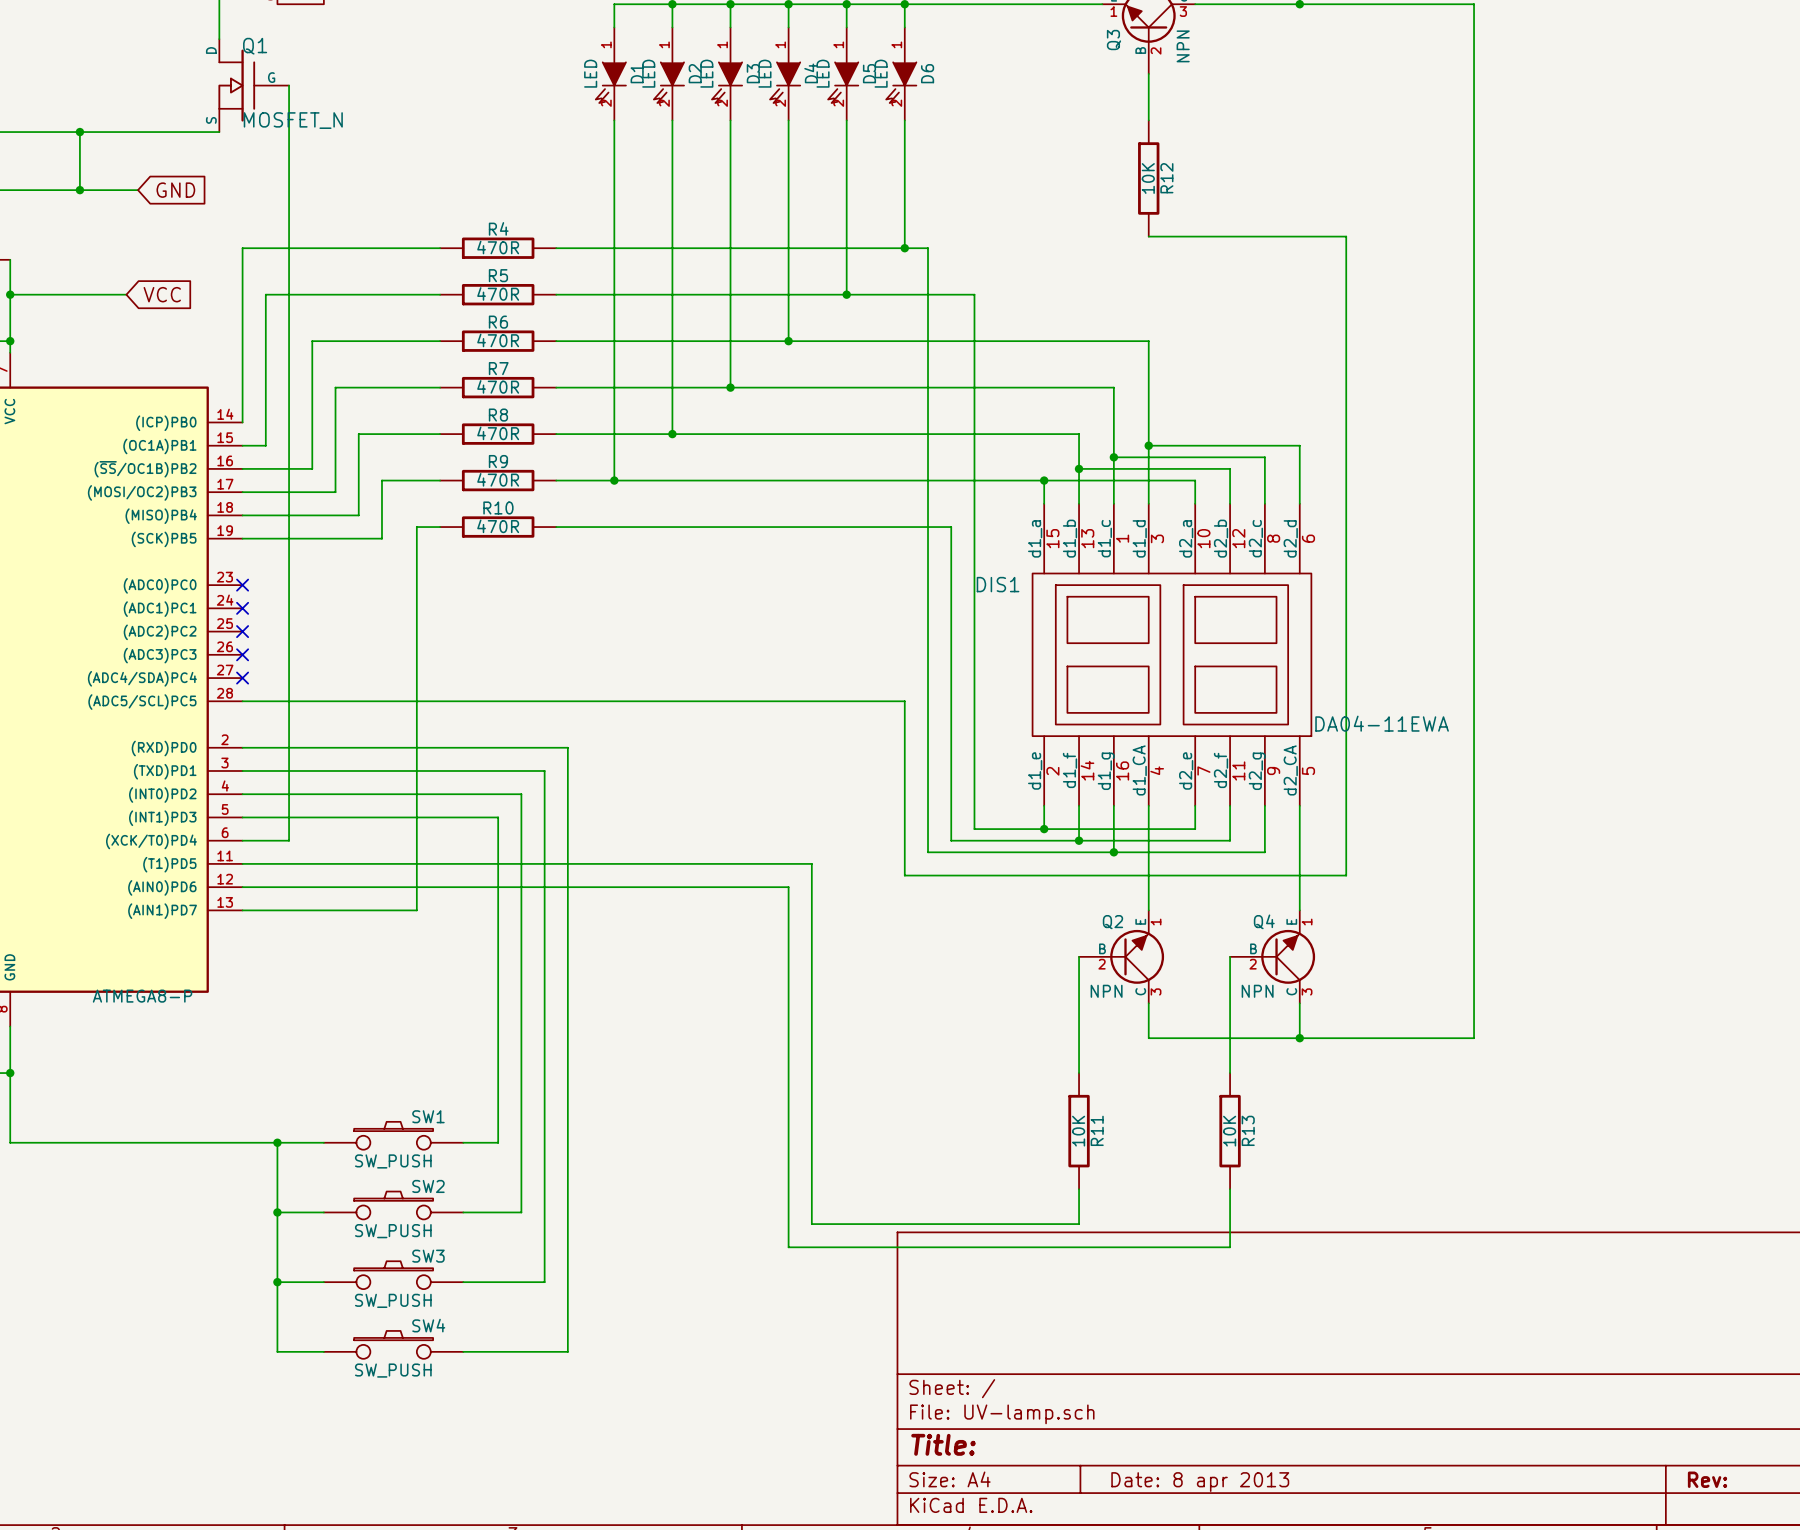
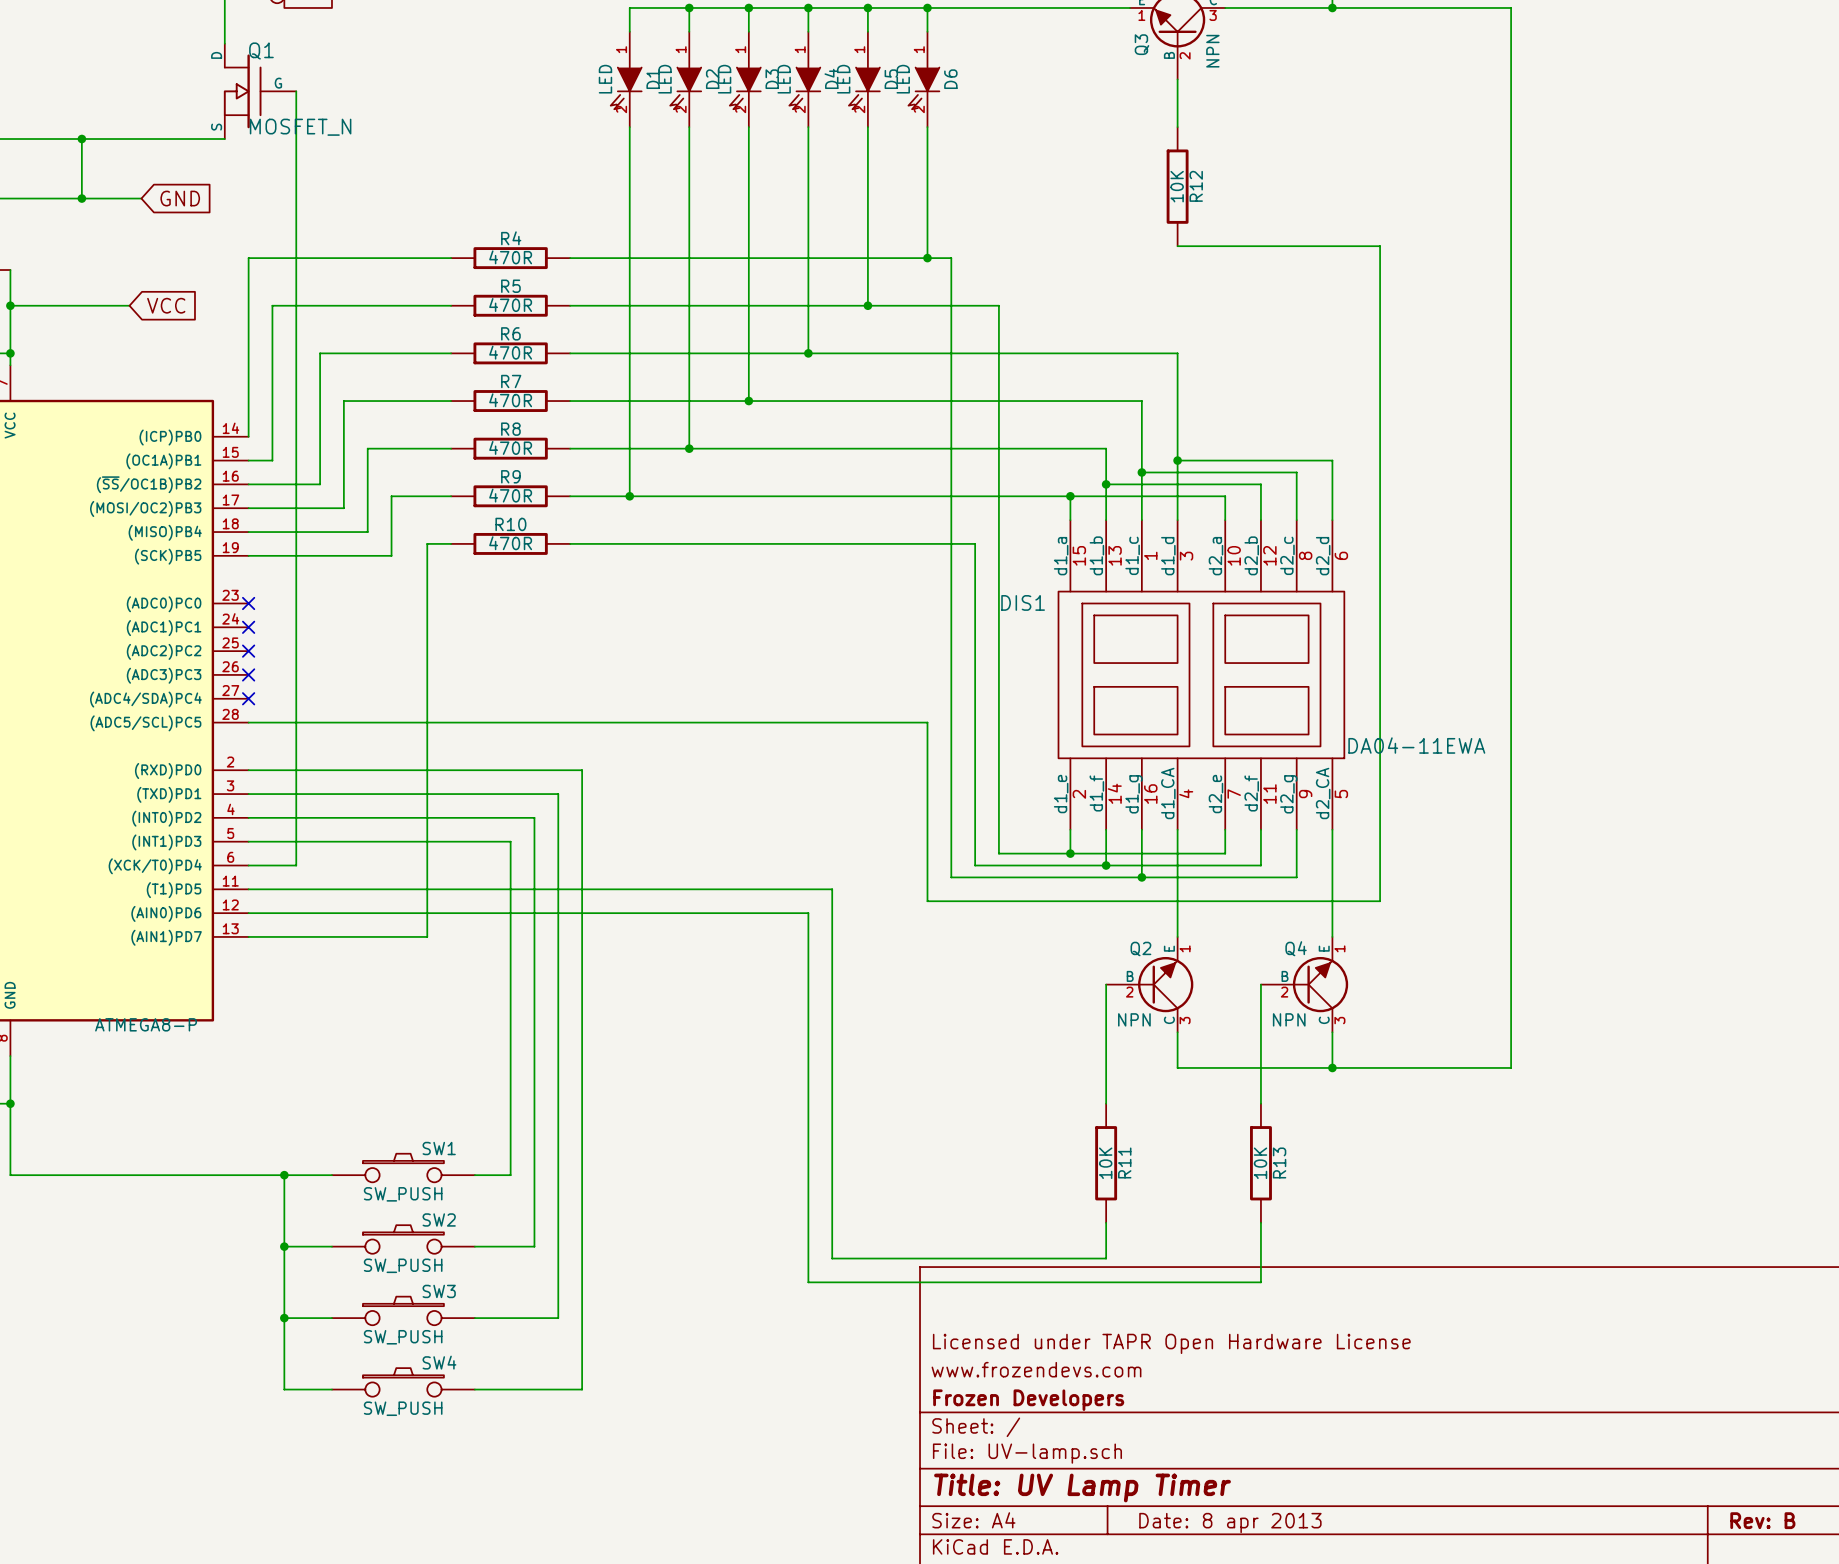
title block: none -> Licensed under TAPR Open Hardware License (1171, 1343)
title block: none -> www.frozendevs.com (1036, 1369)
title block: none -> Frozen Developers (1028, 1400)
title block: Title: (943, 1444) -> Title: UV Lamp Timer (1082, 1487)
title block: Rev: (1707, 1479) -> Rev: B (1762, 1520)

